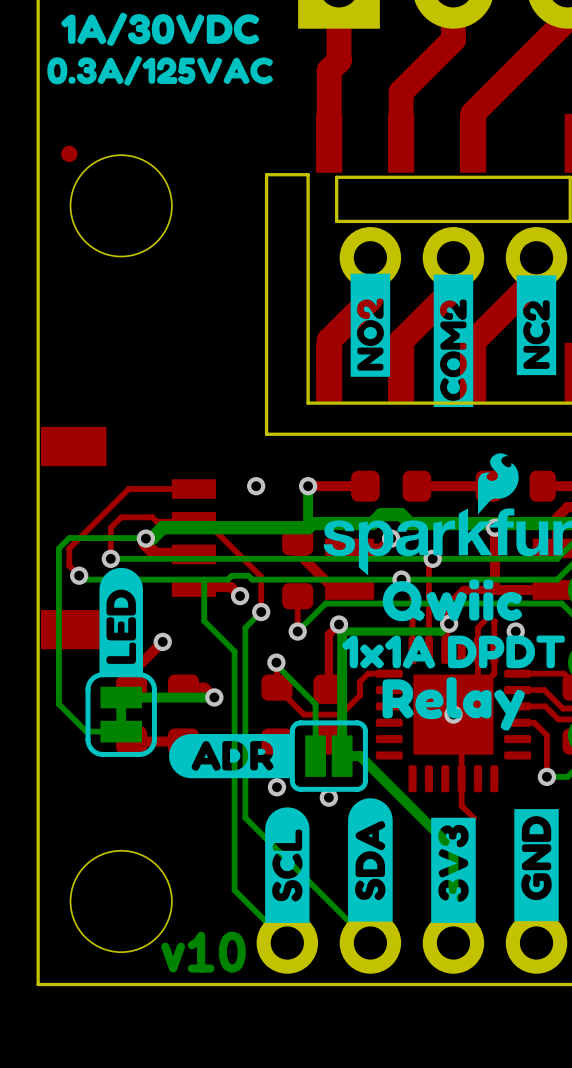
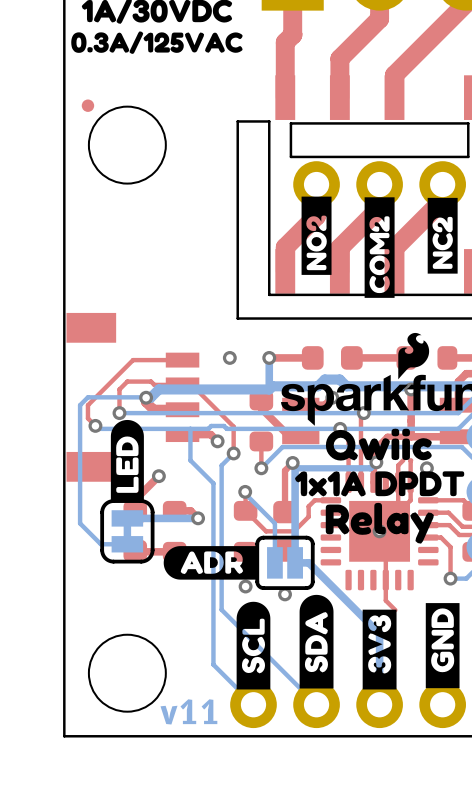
text: v10 (203, 952) -> v11 (188, 711)

